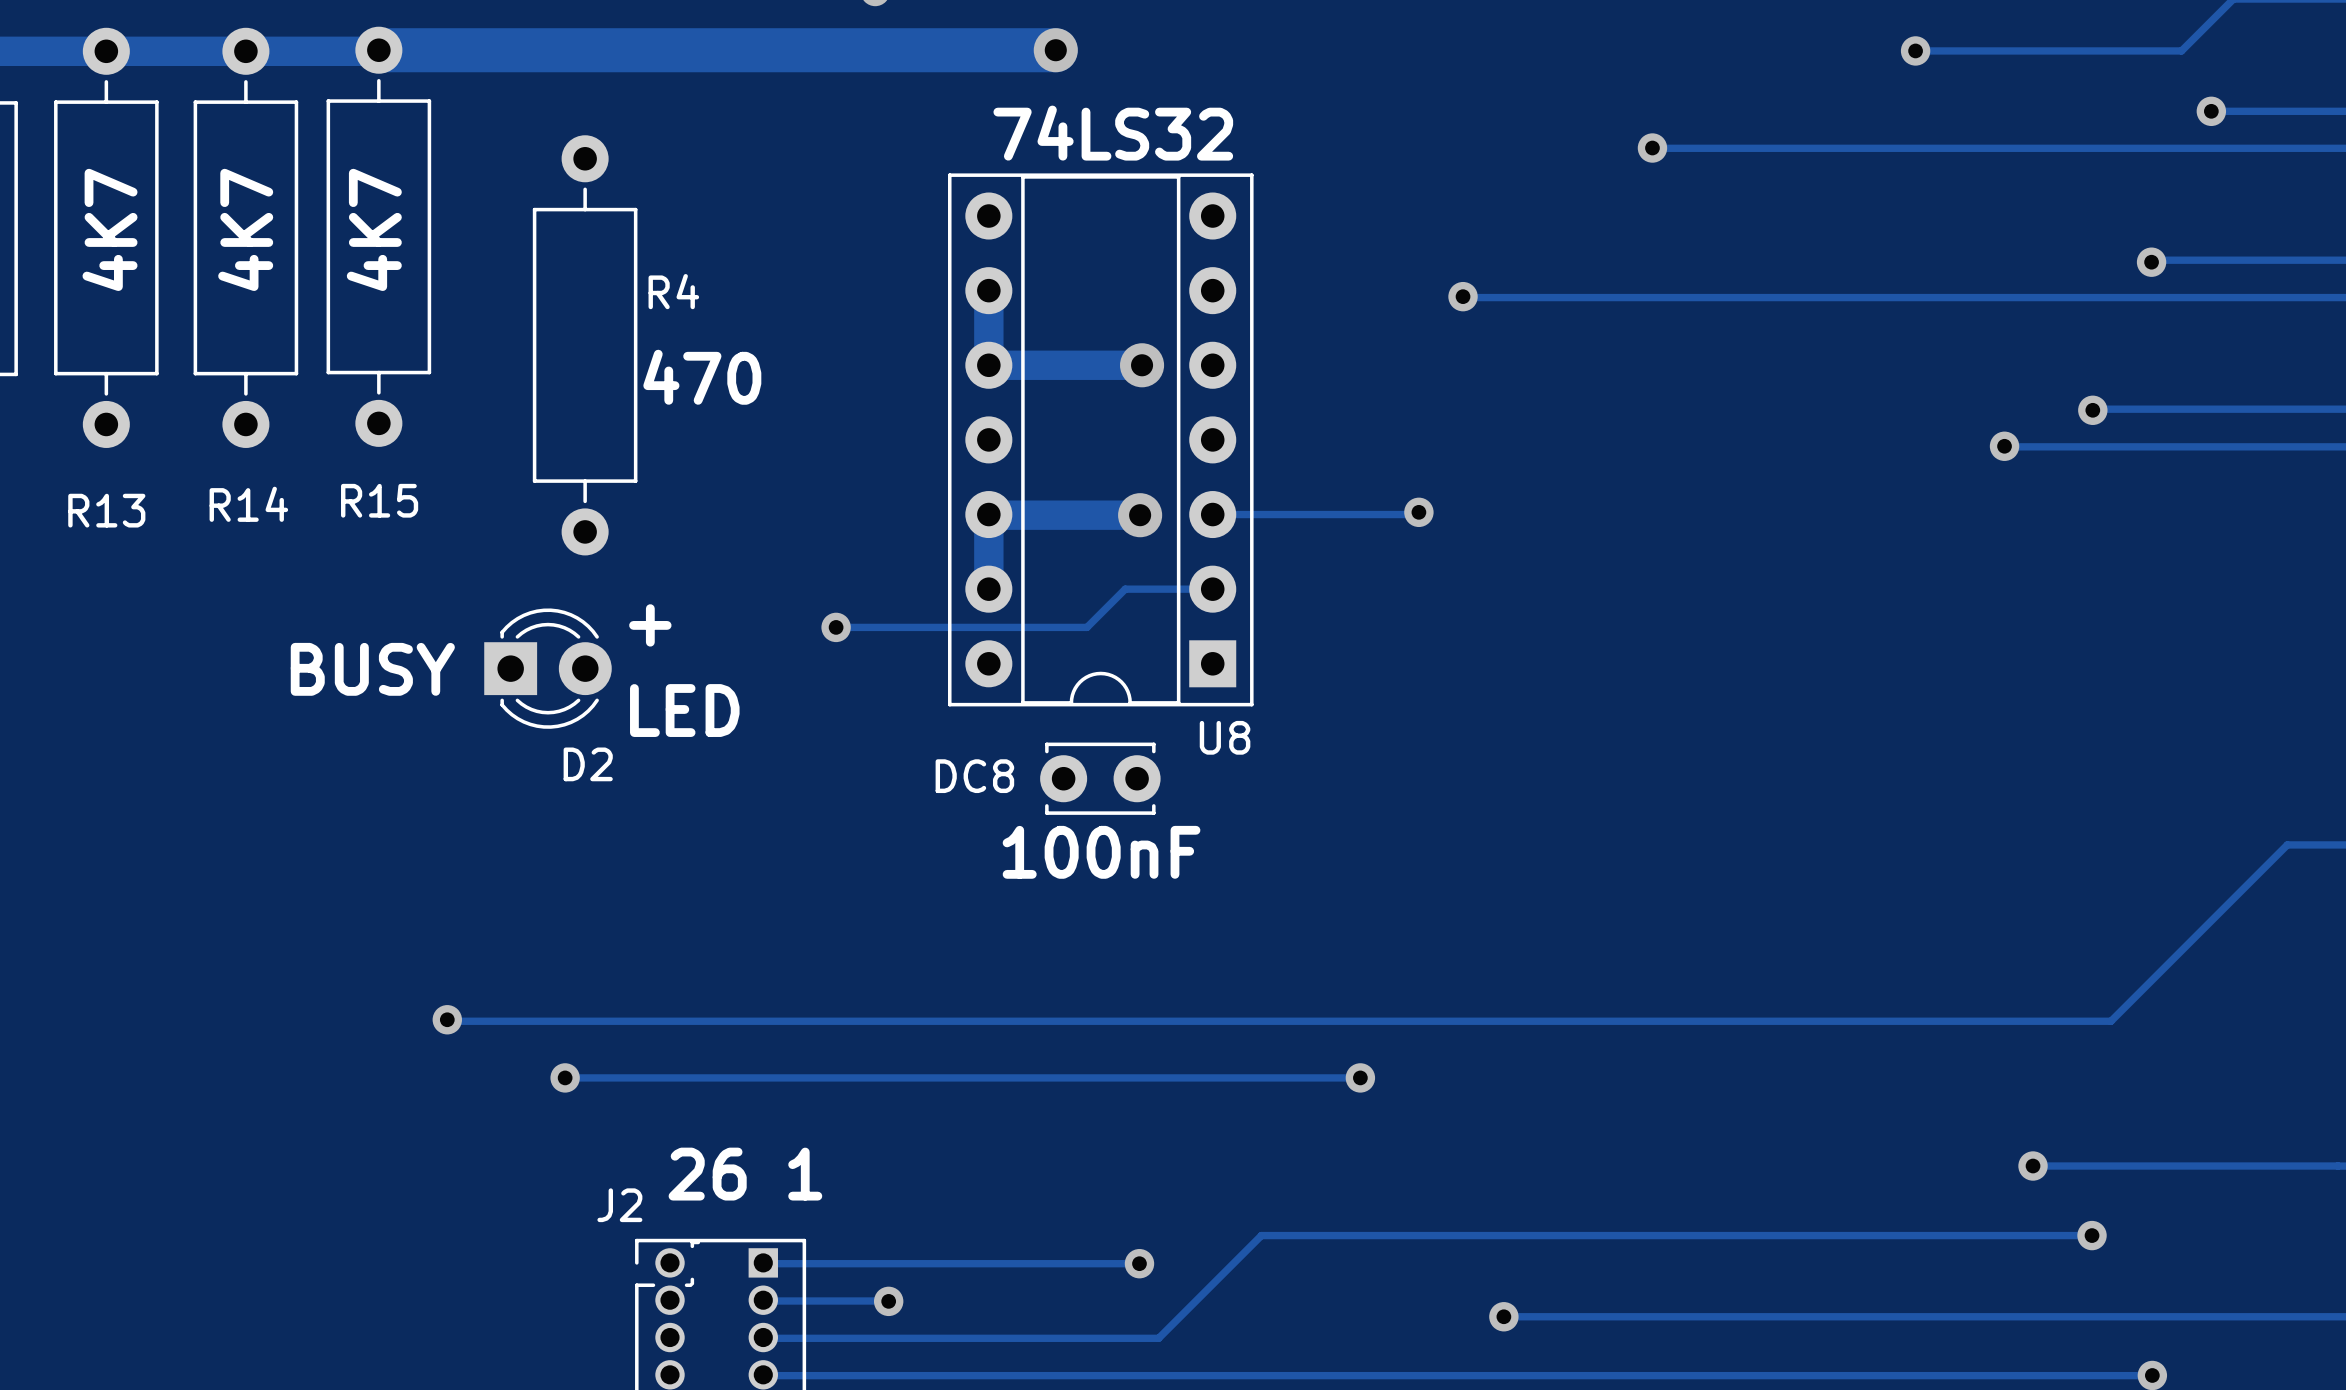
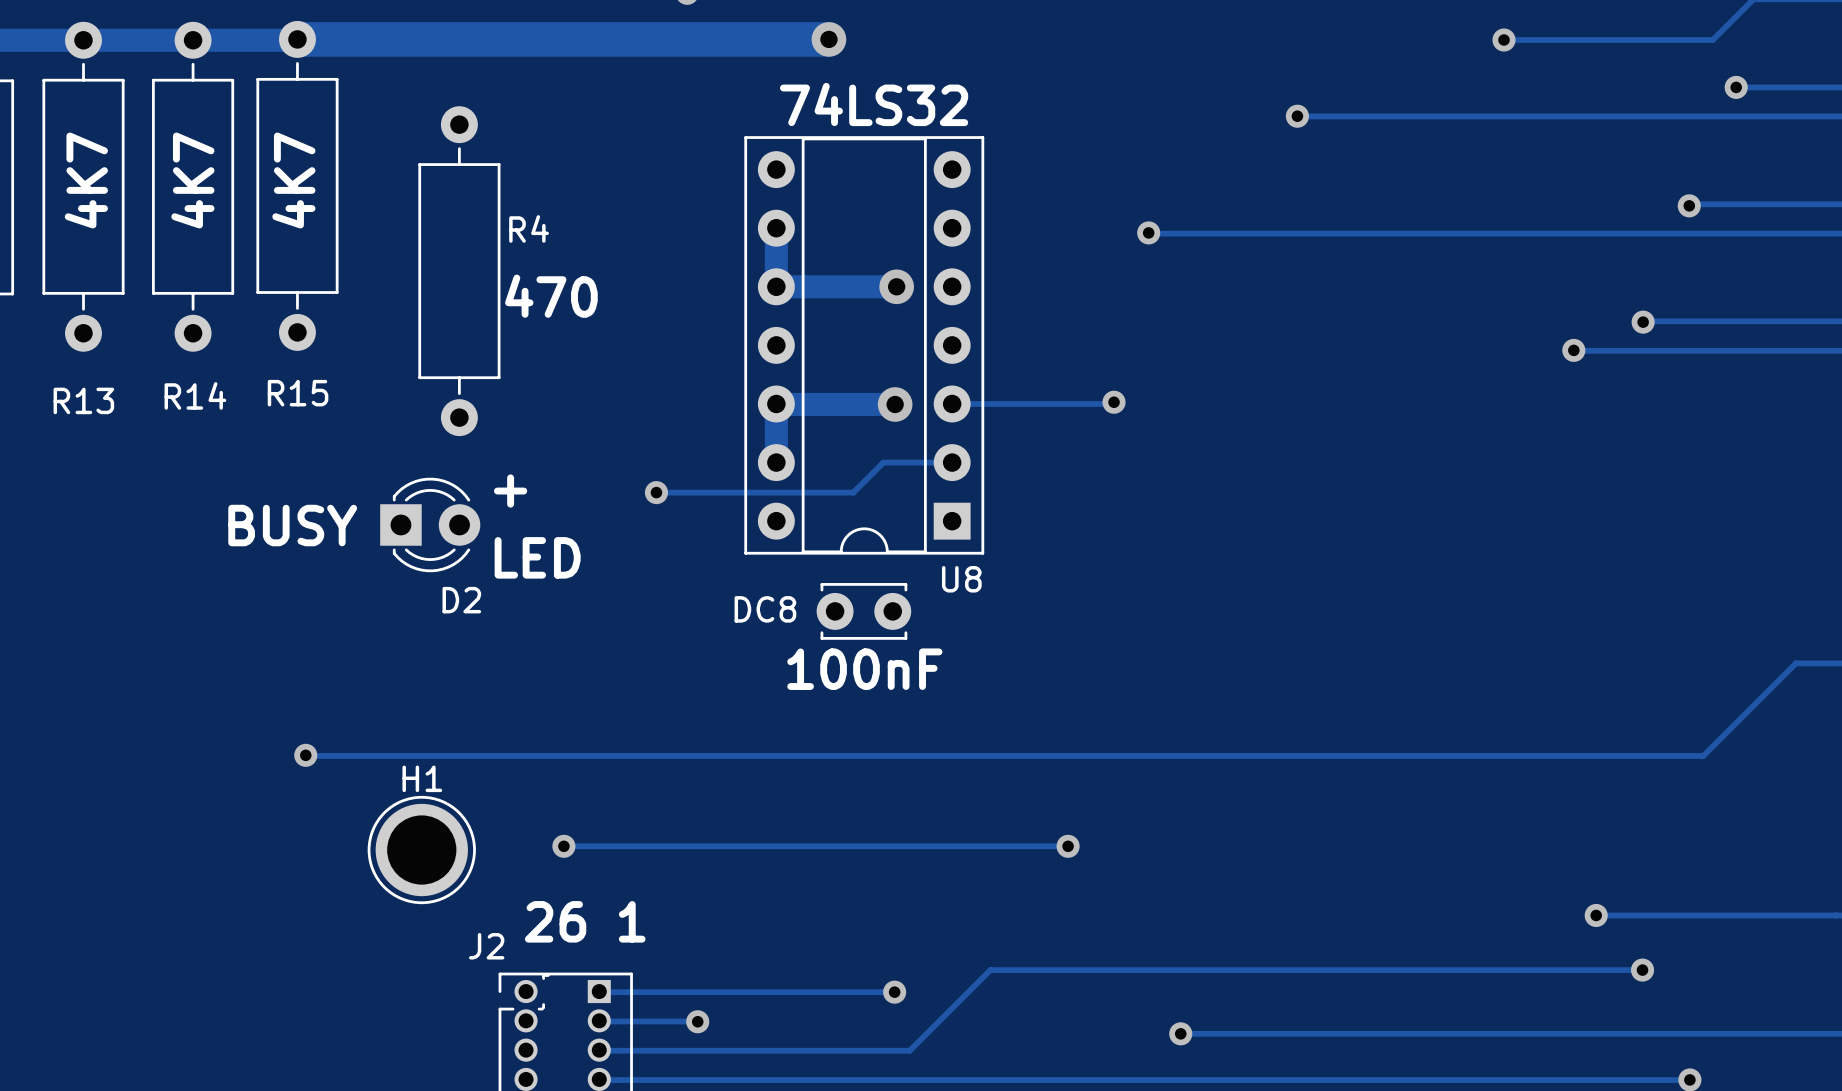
track: (2169, 962) (2111, 1021) (448, 1021) (447, 1019) -> (1703, 755) (305, 755)
via position: (447, 1019) -> (305, 755)
track: (565, 1077) (718, 1077) -> none
via: (565, 1077) -> none
via: none -> (563, 846)
H1: none -> (421, 850)

